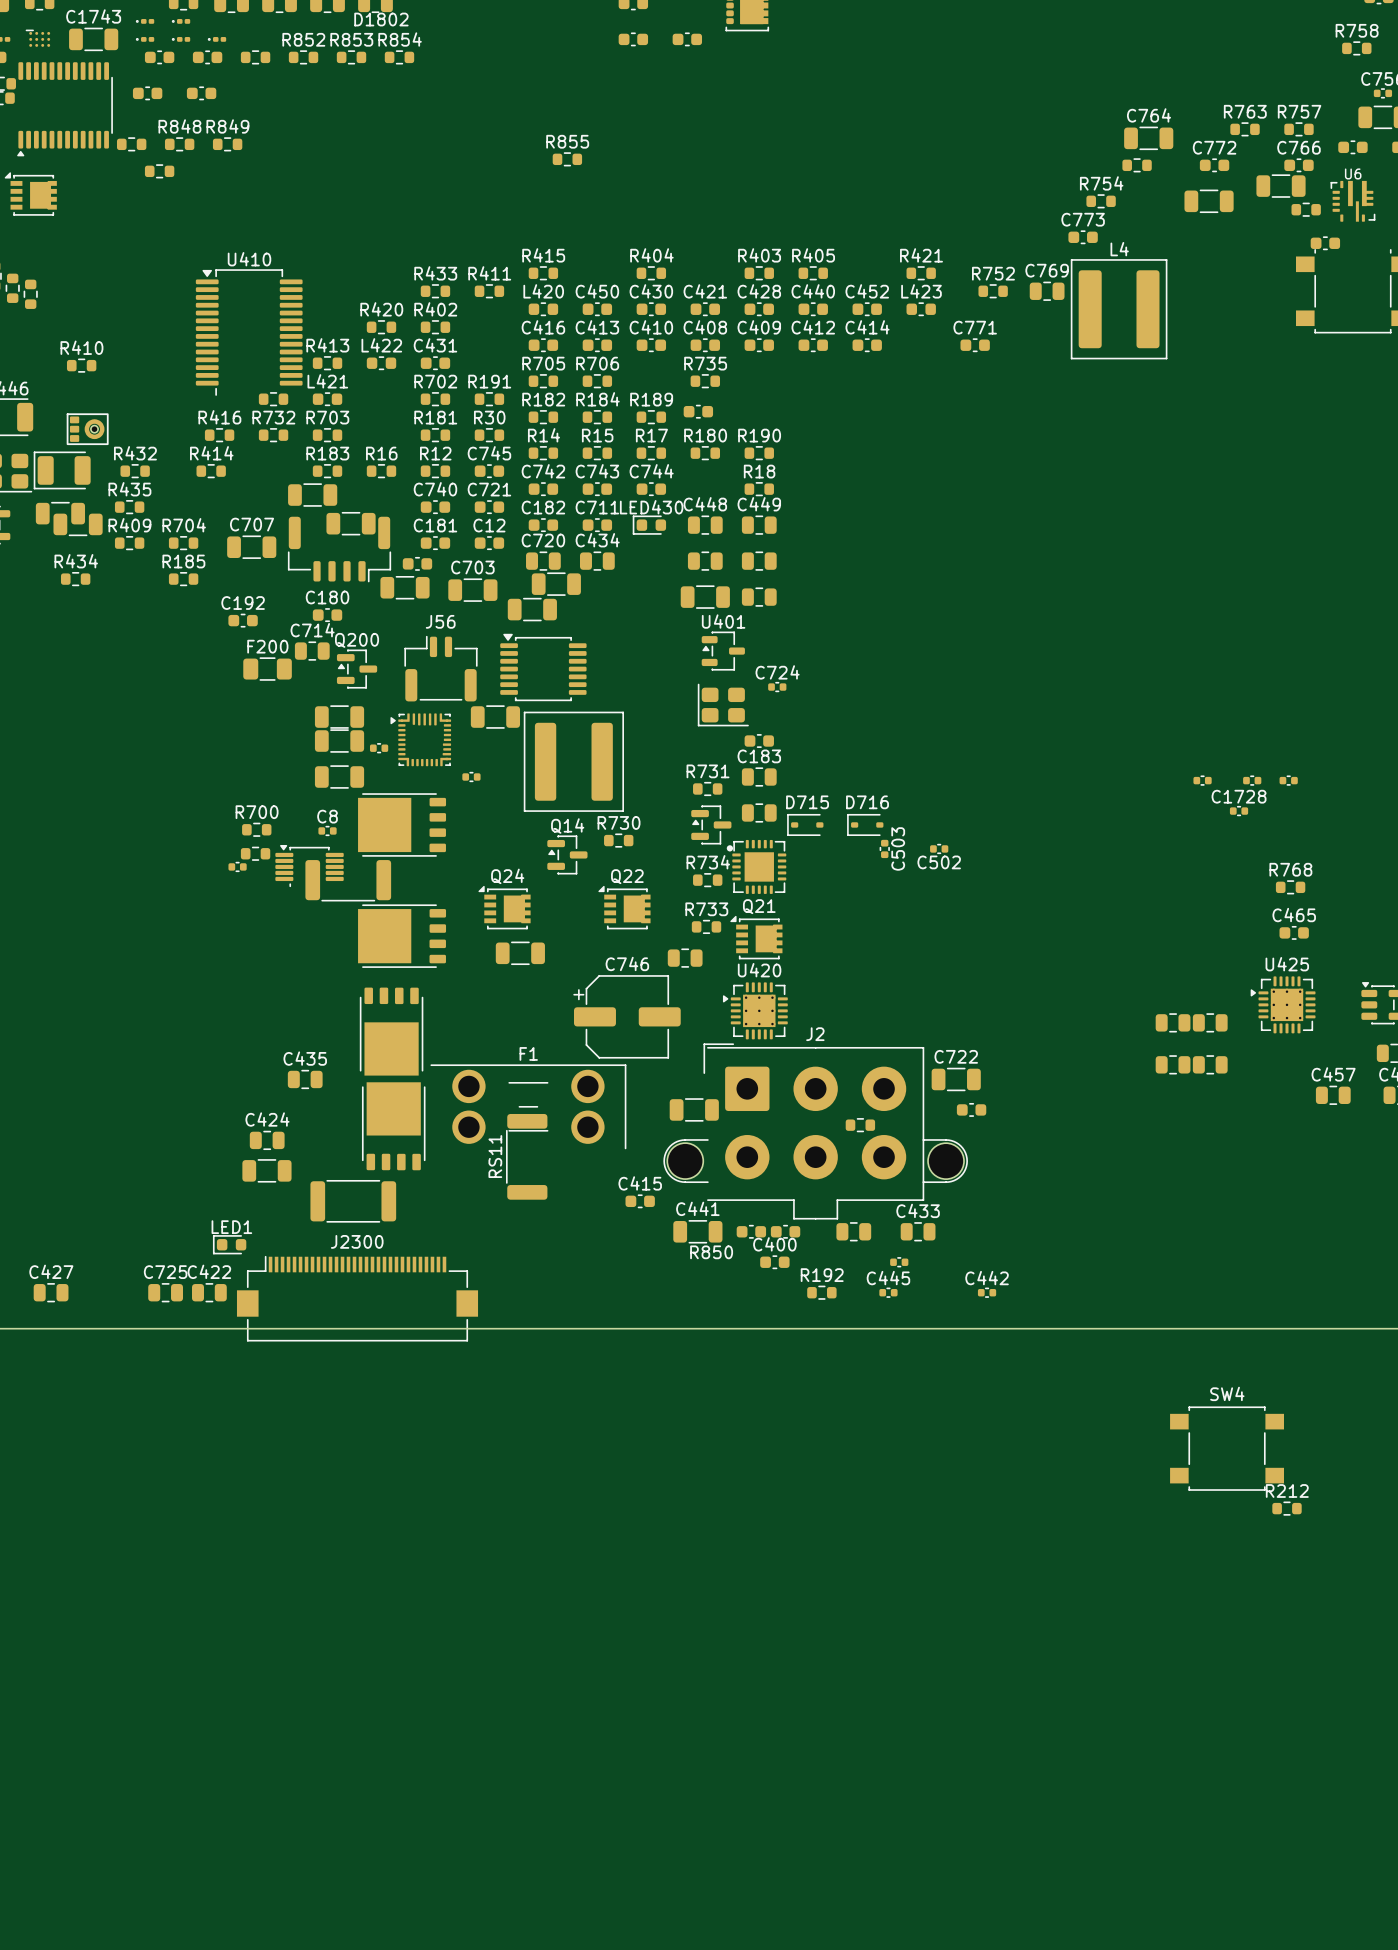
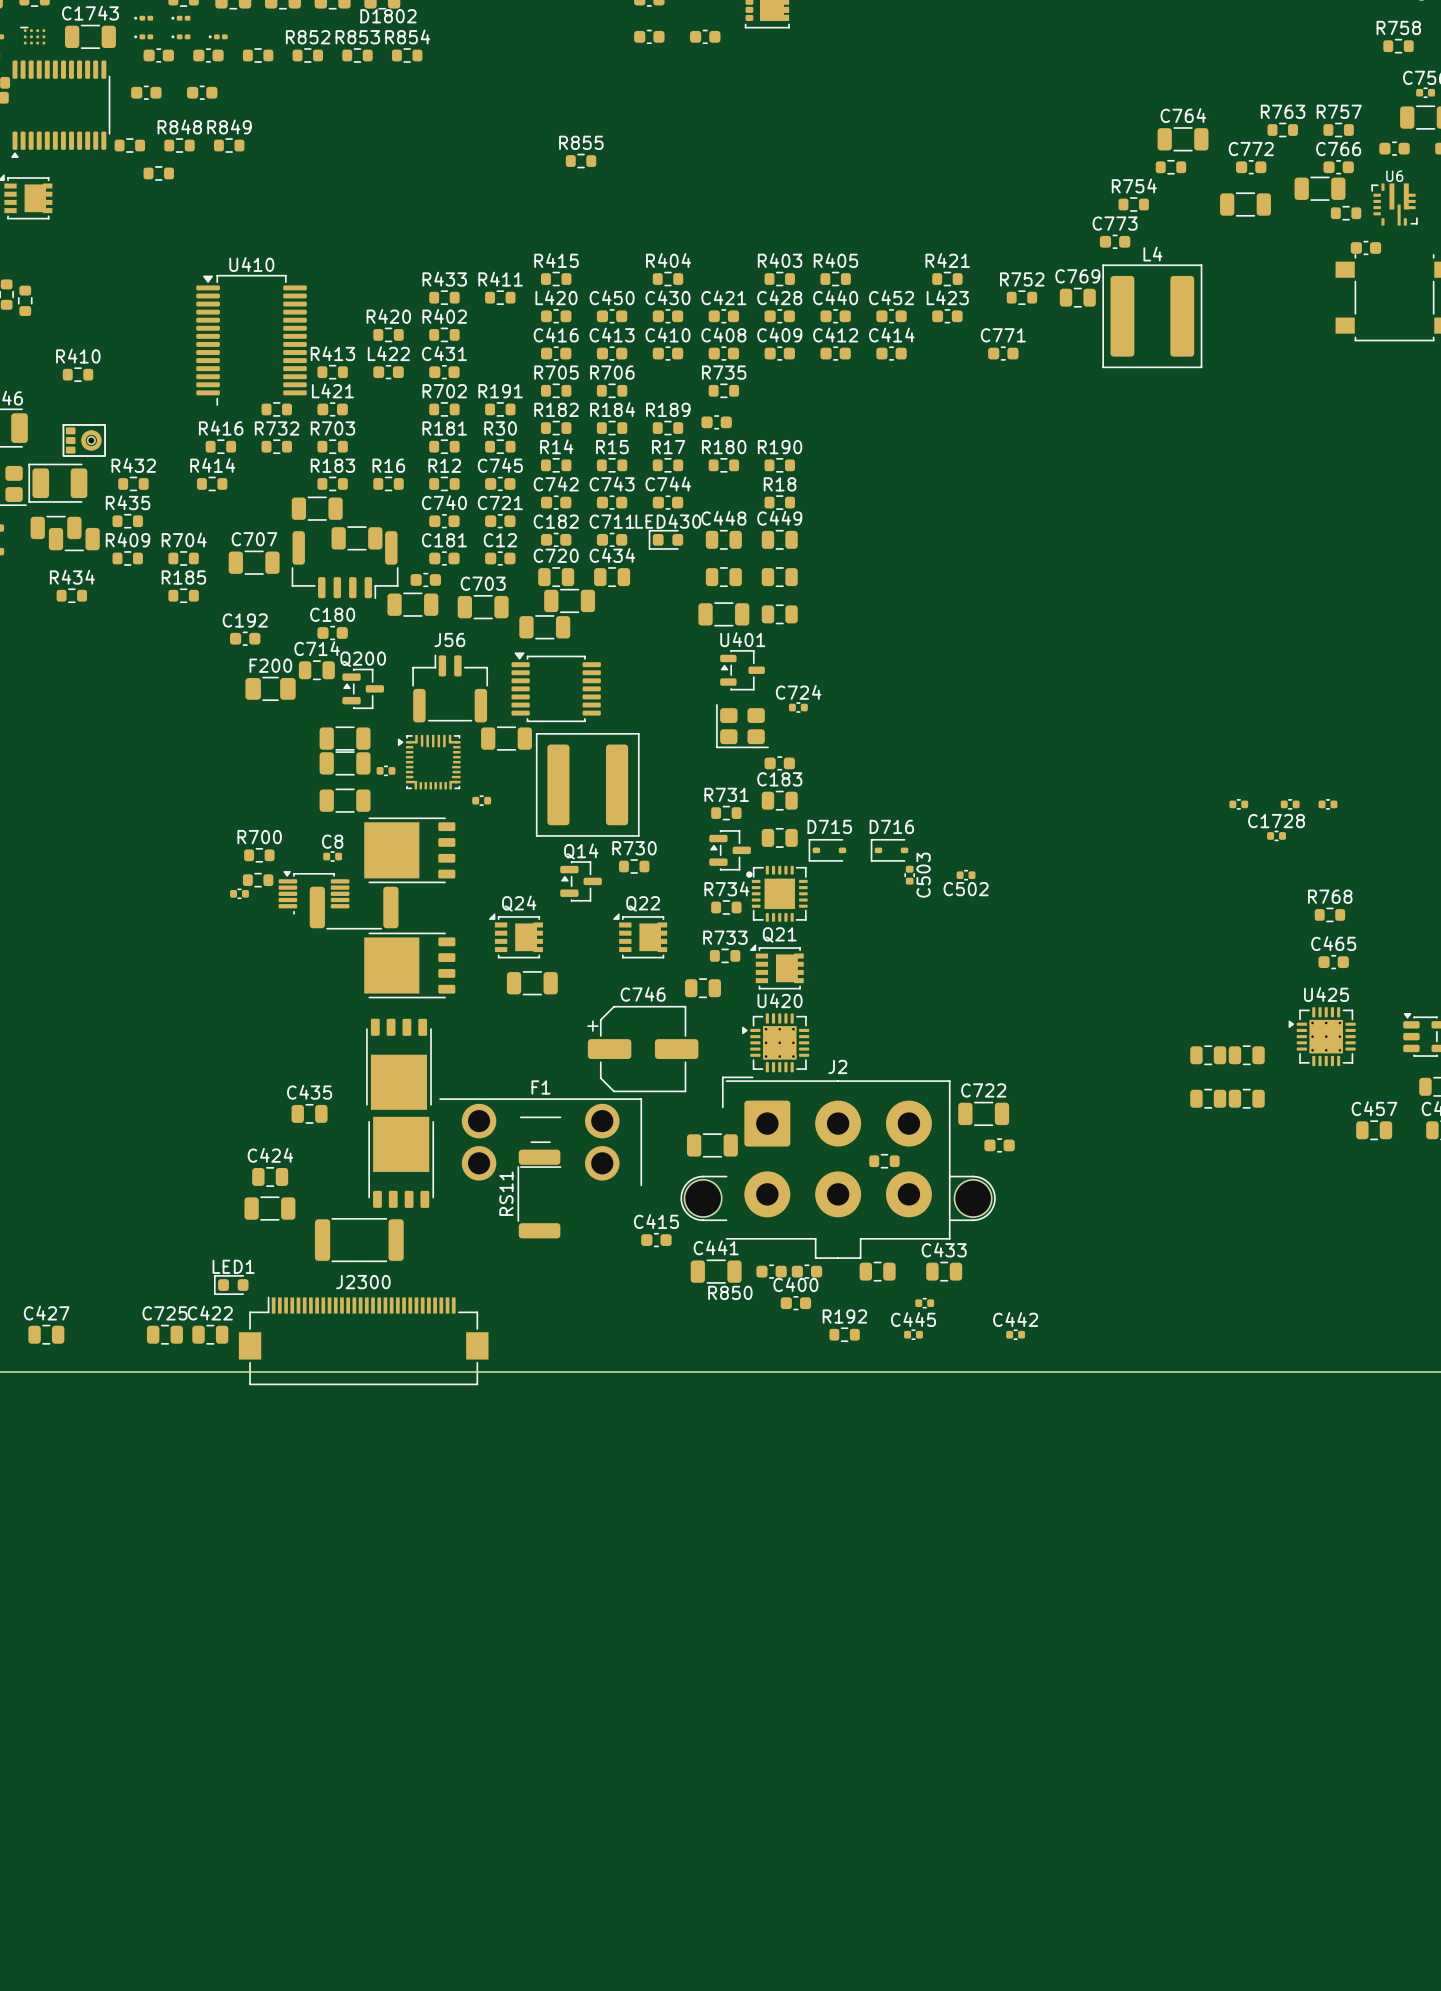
SW4: (1227, 1448) -> none
R212: (1287, 1508) -> none

